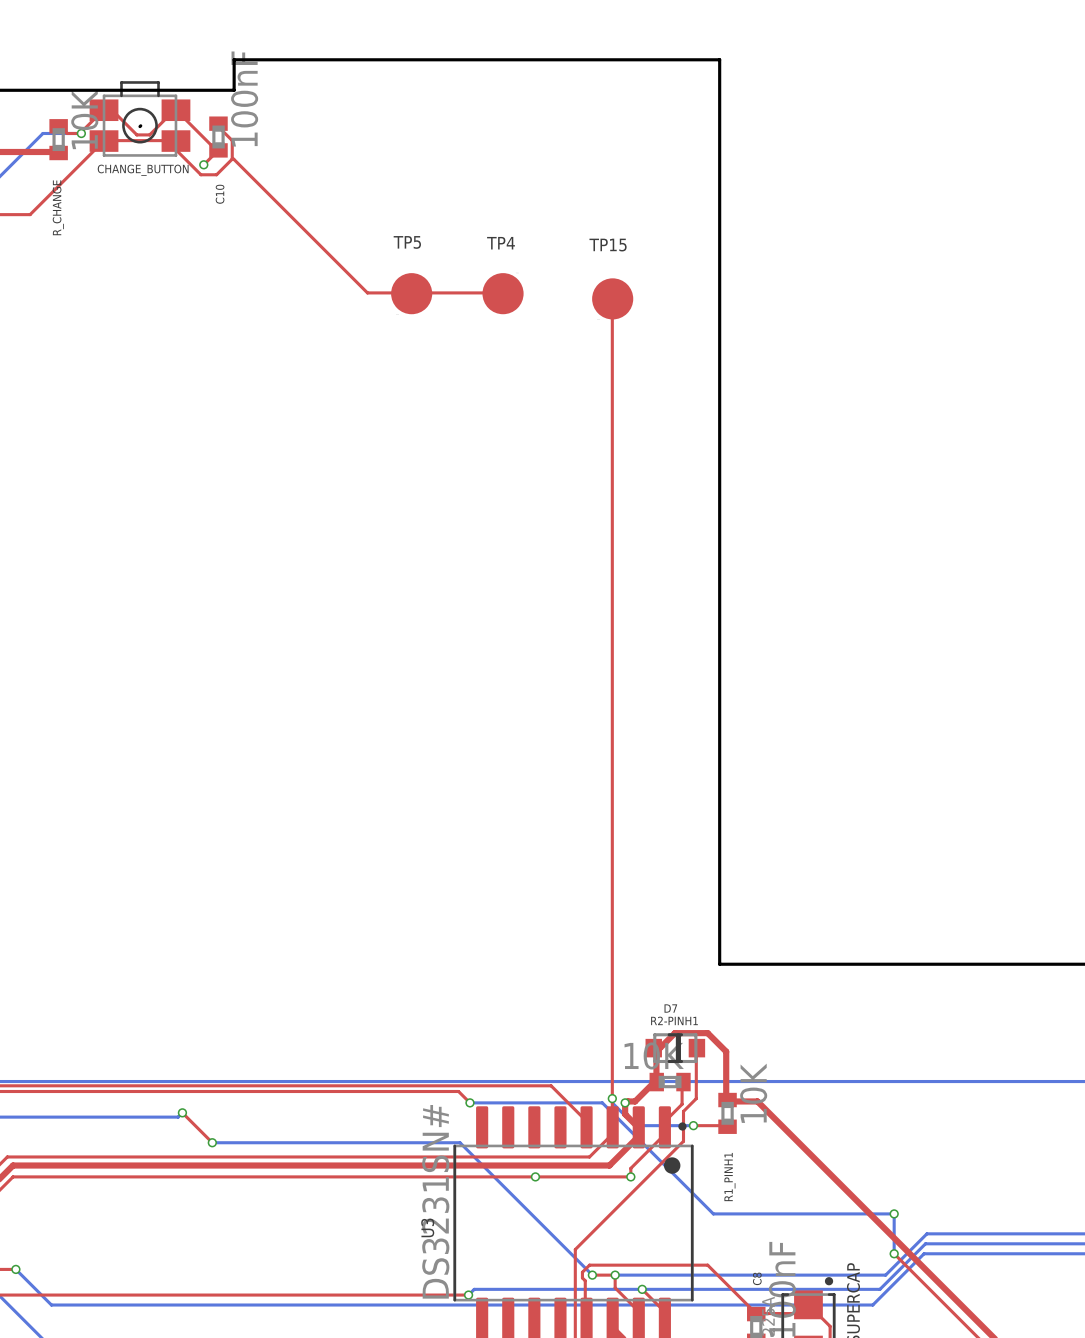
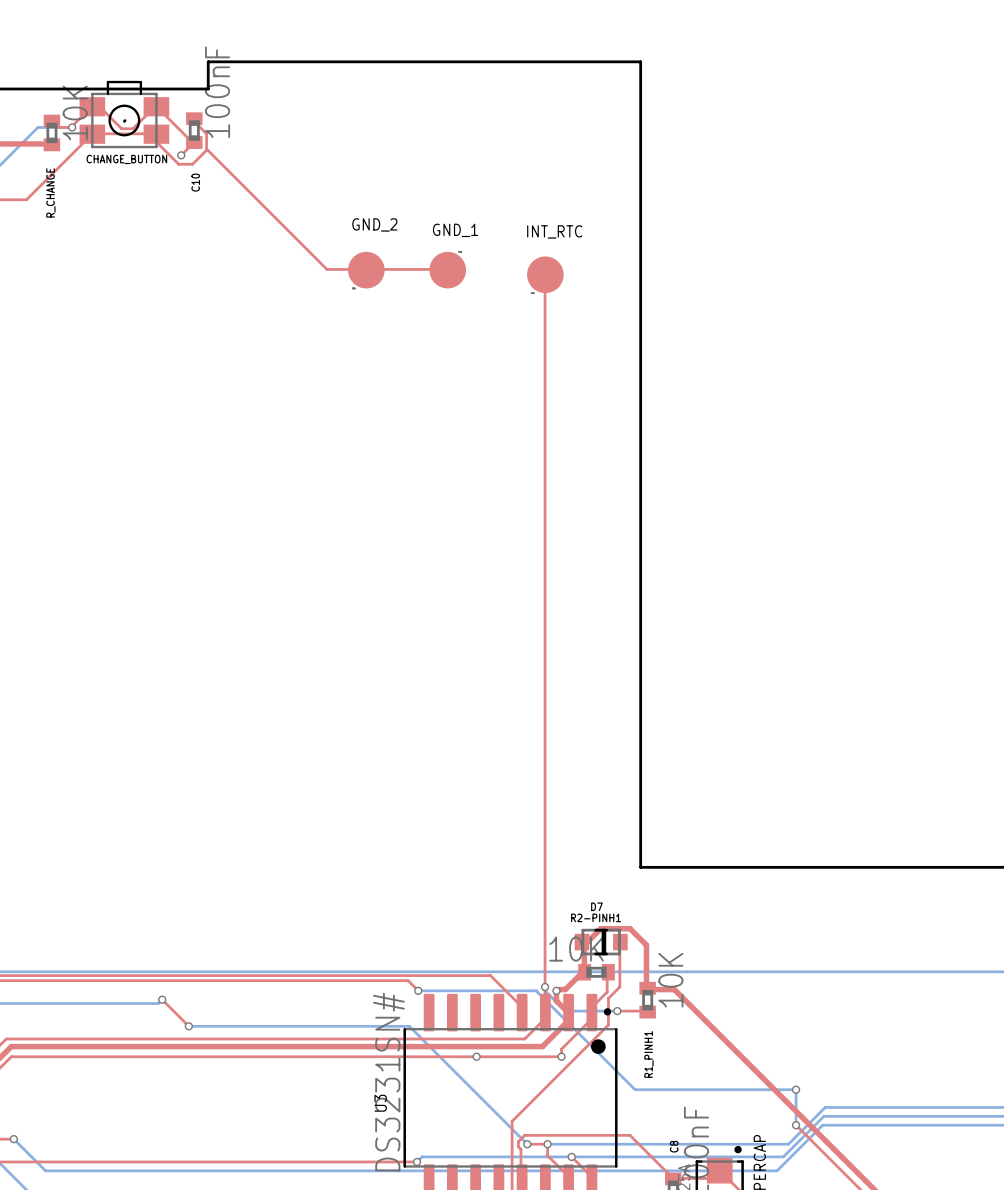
TP5 name: TP5 (407, 242) -> GND_2 (374, 224)
TP4 name: TP4 (500, 243) -> GND_1 (455, 230)
TP15 name: TP15 (608, 245) -> INT_RTC (554, 231)

